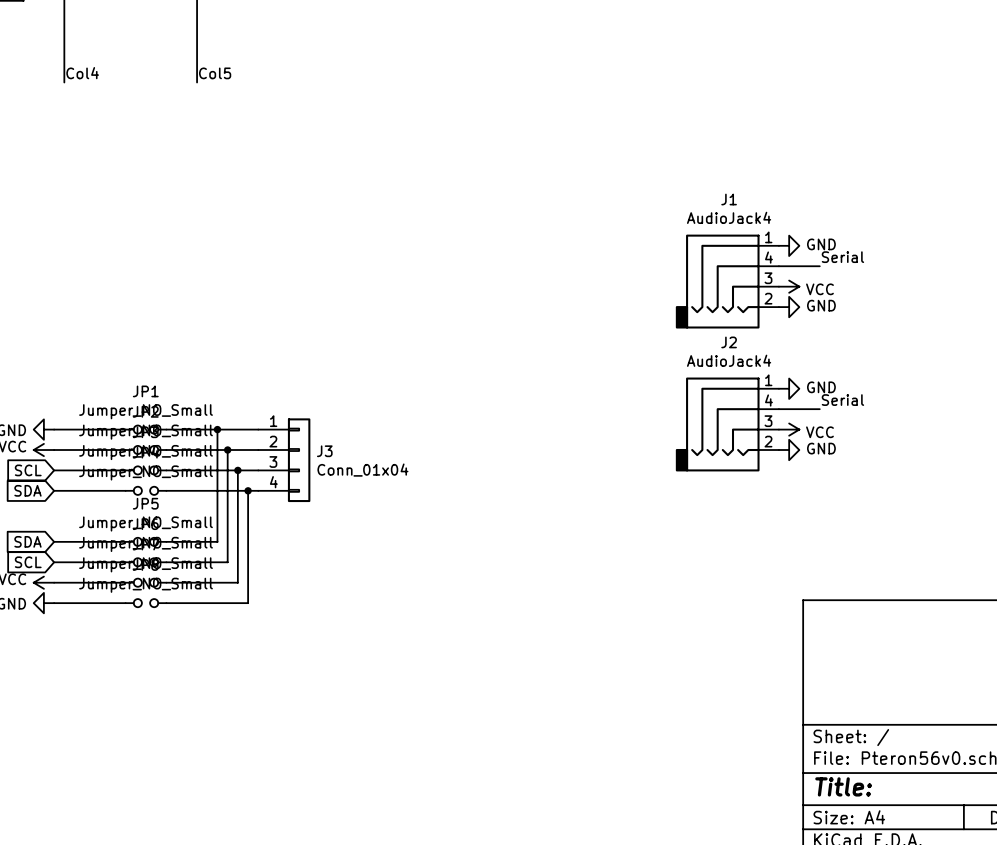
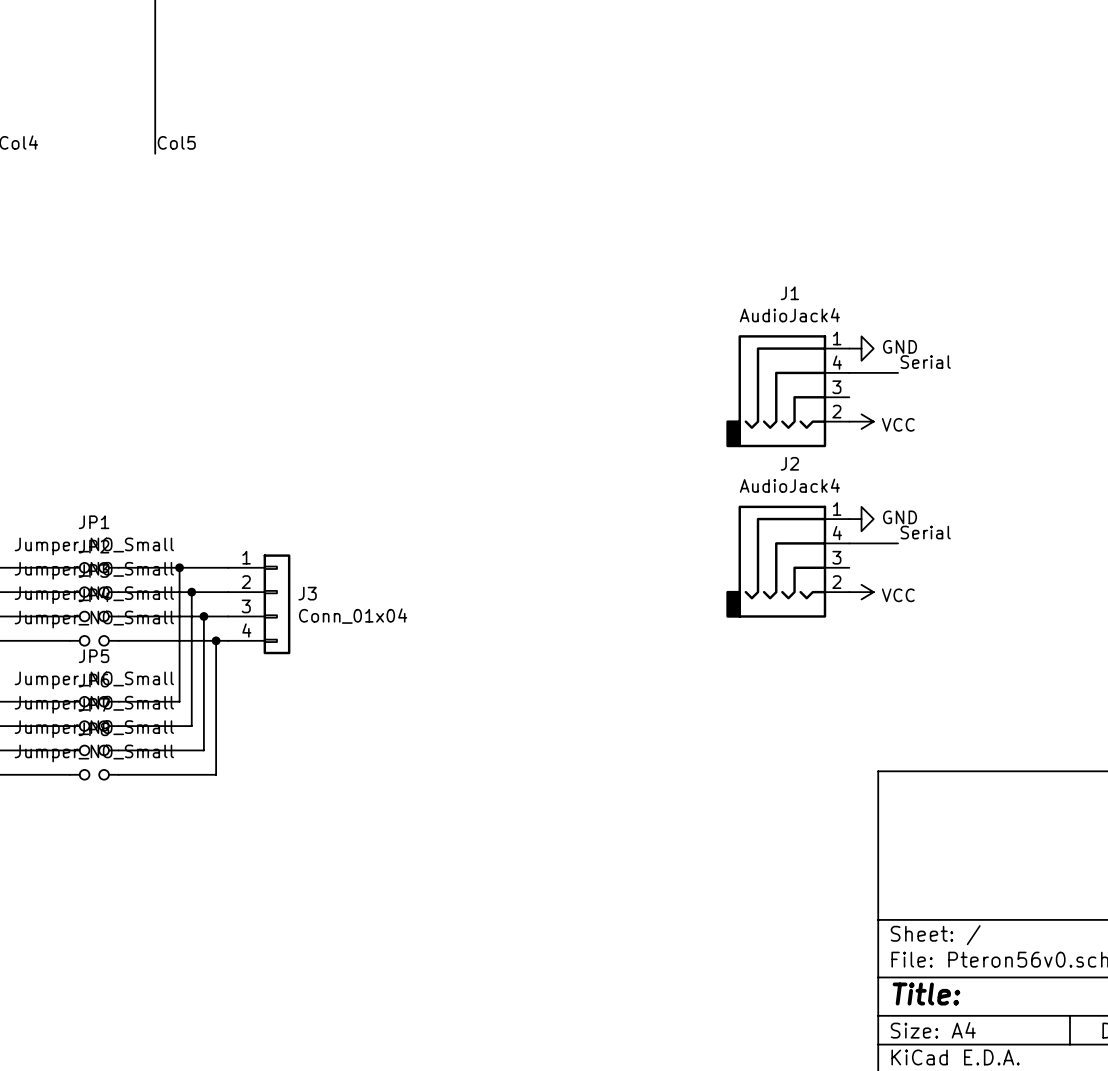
power symbol: VCC (789, 286) -> none
power symbol: GND (789, 307) -> VCC (861, 421)
power symbol: VCC (789, 429) -> none
power symbol: GND (789, 450) -> VCC (861, 592)

